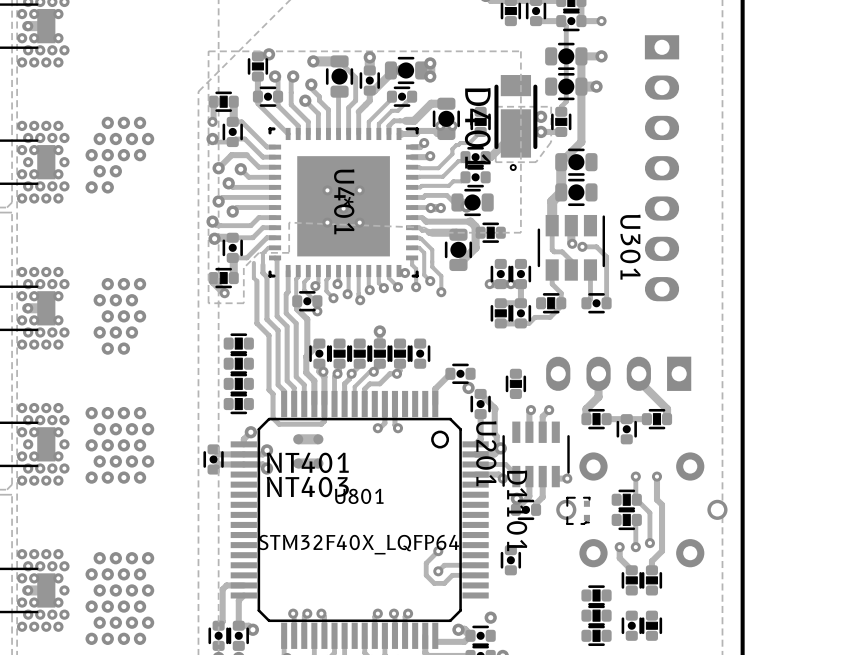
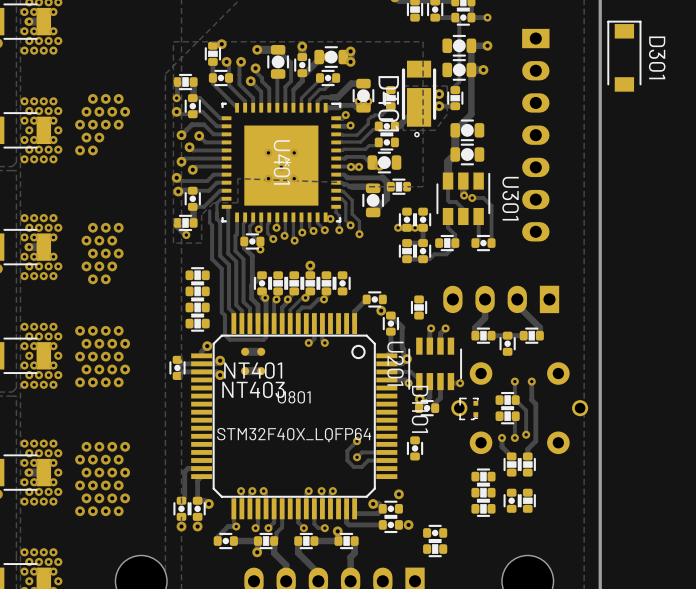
D301: none -> (624, 56)

